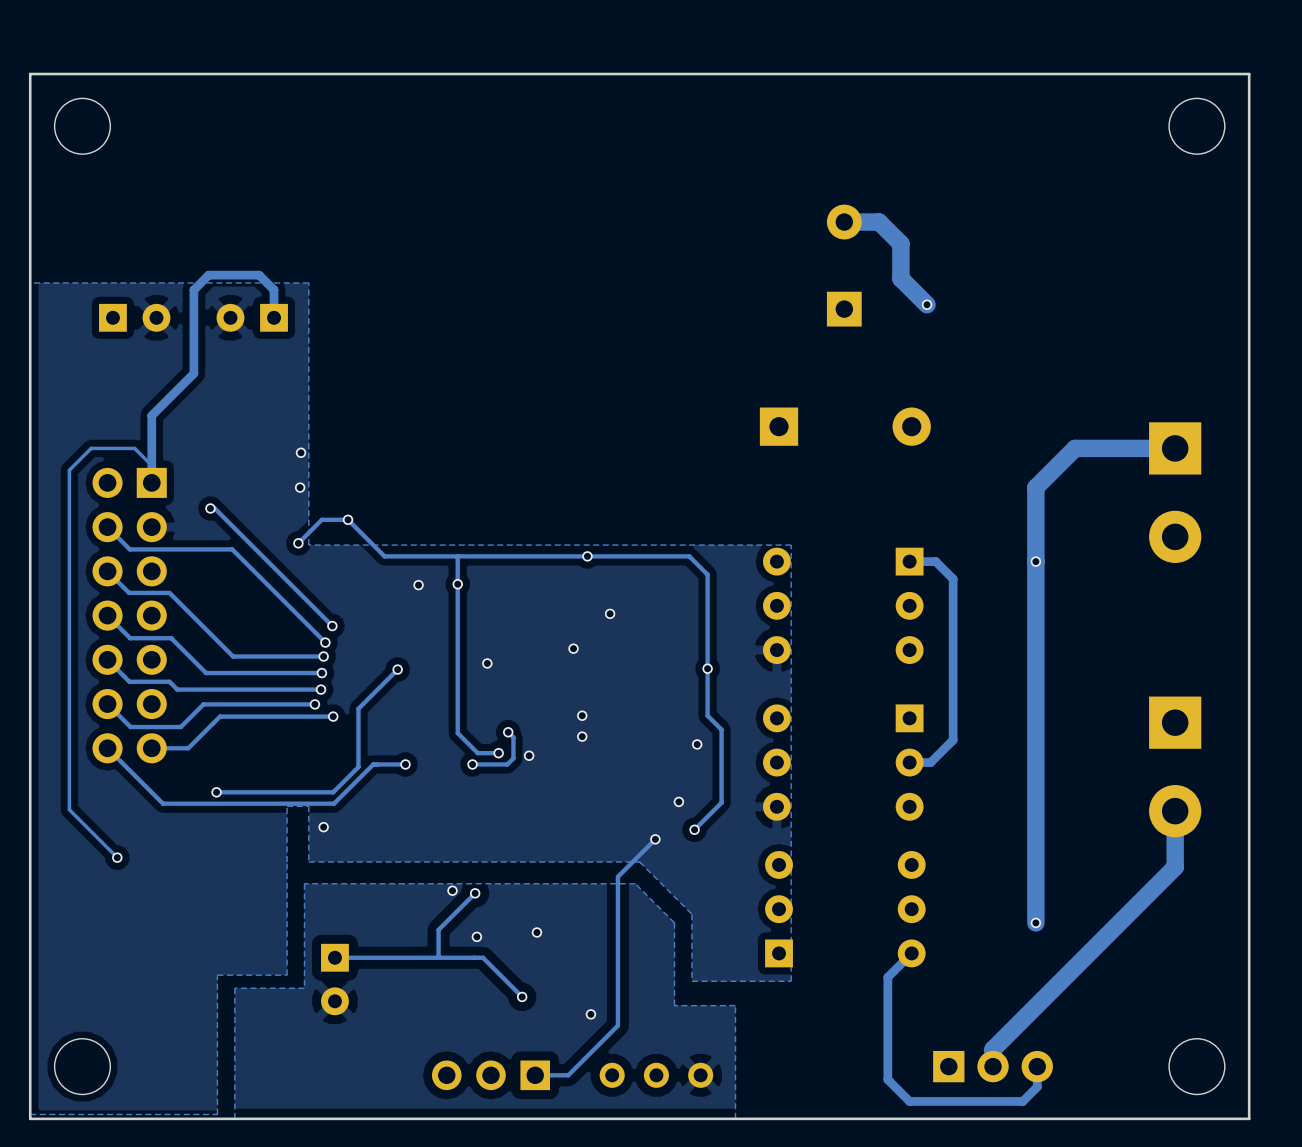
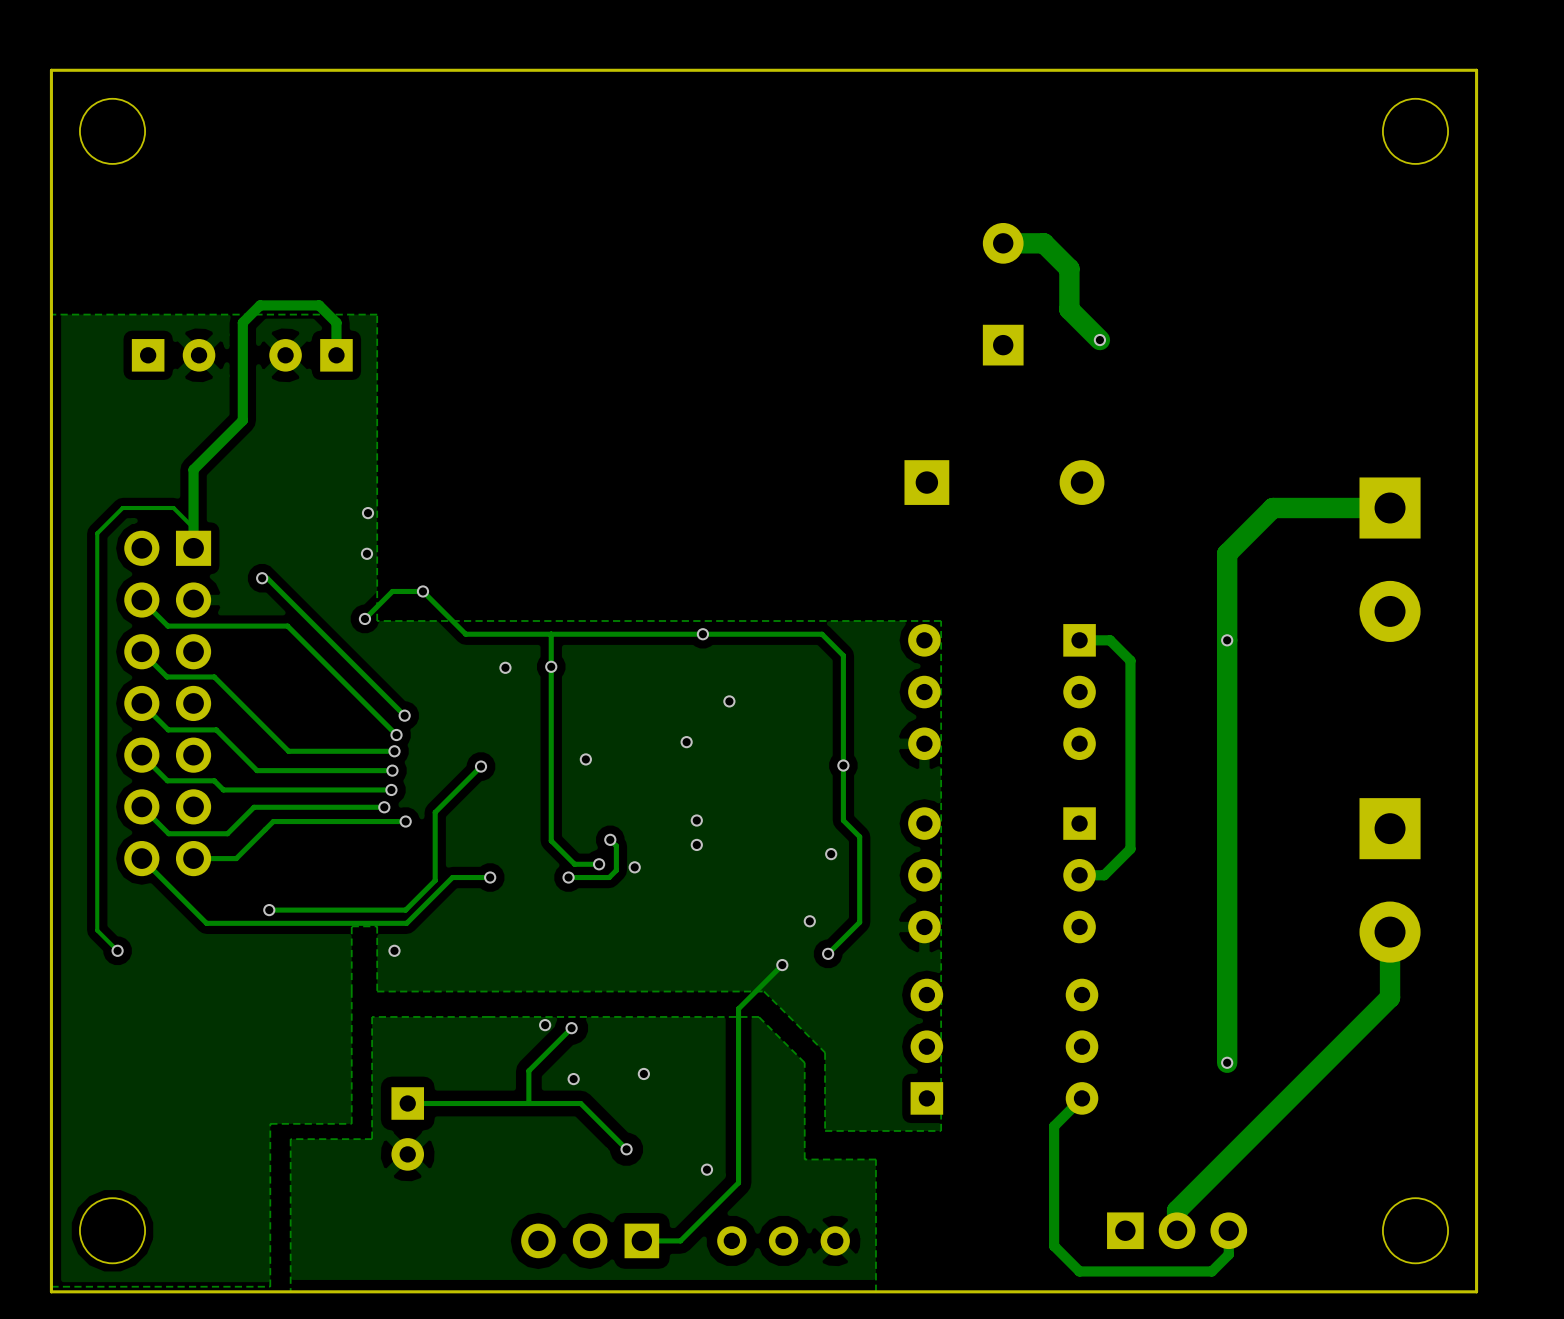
track: (86, 827) (117, 857) -> none
via position: (117, 857) -> (117, 950)

